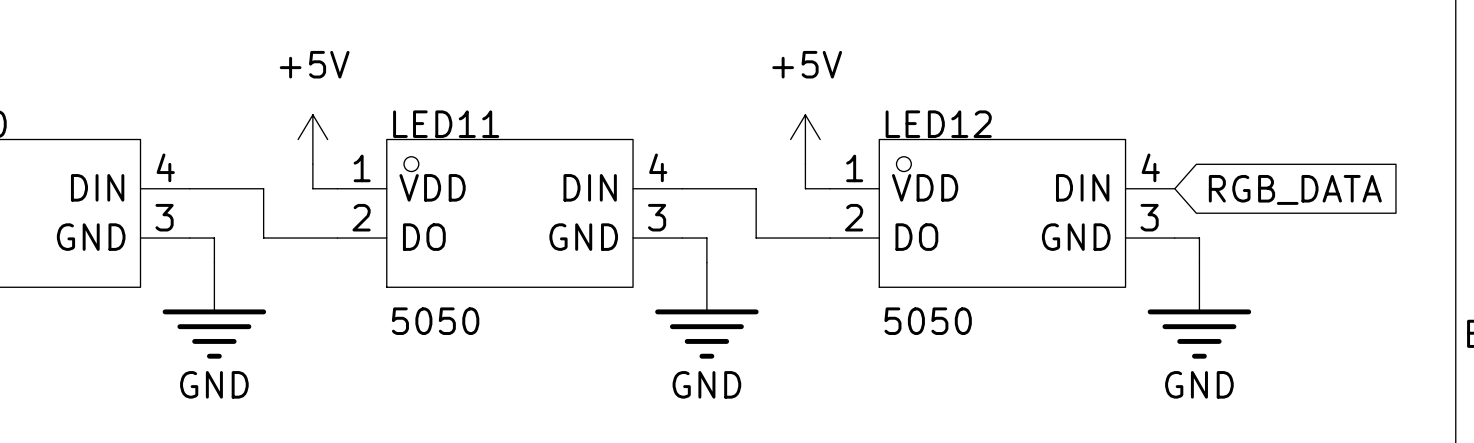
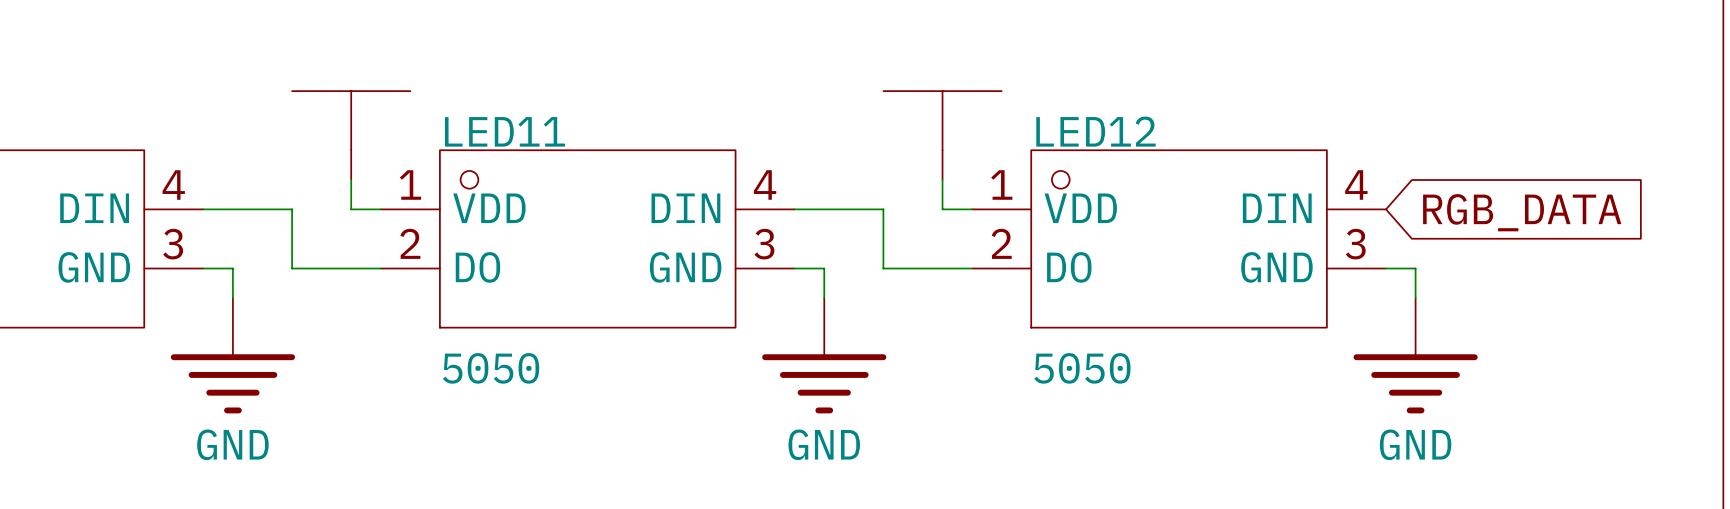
power symbol text: +5V (314, 64) -> none
power symbol text: +5V (807, 64) -> none
power symbol shape: [298, 114, 328, 165] -> [292, 91, 411, 180]
power symbol shape: [790, 114, 821, 165] -> [883, 91, 1002, 180]

